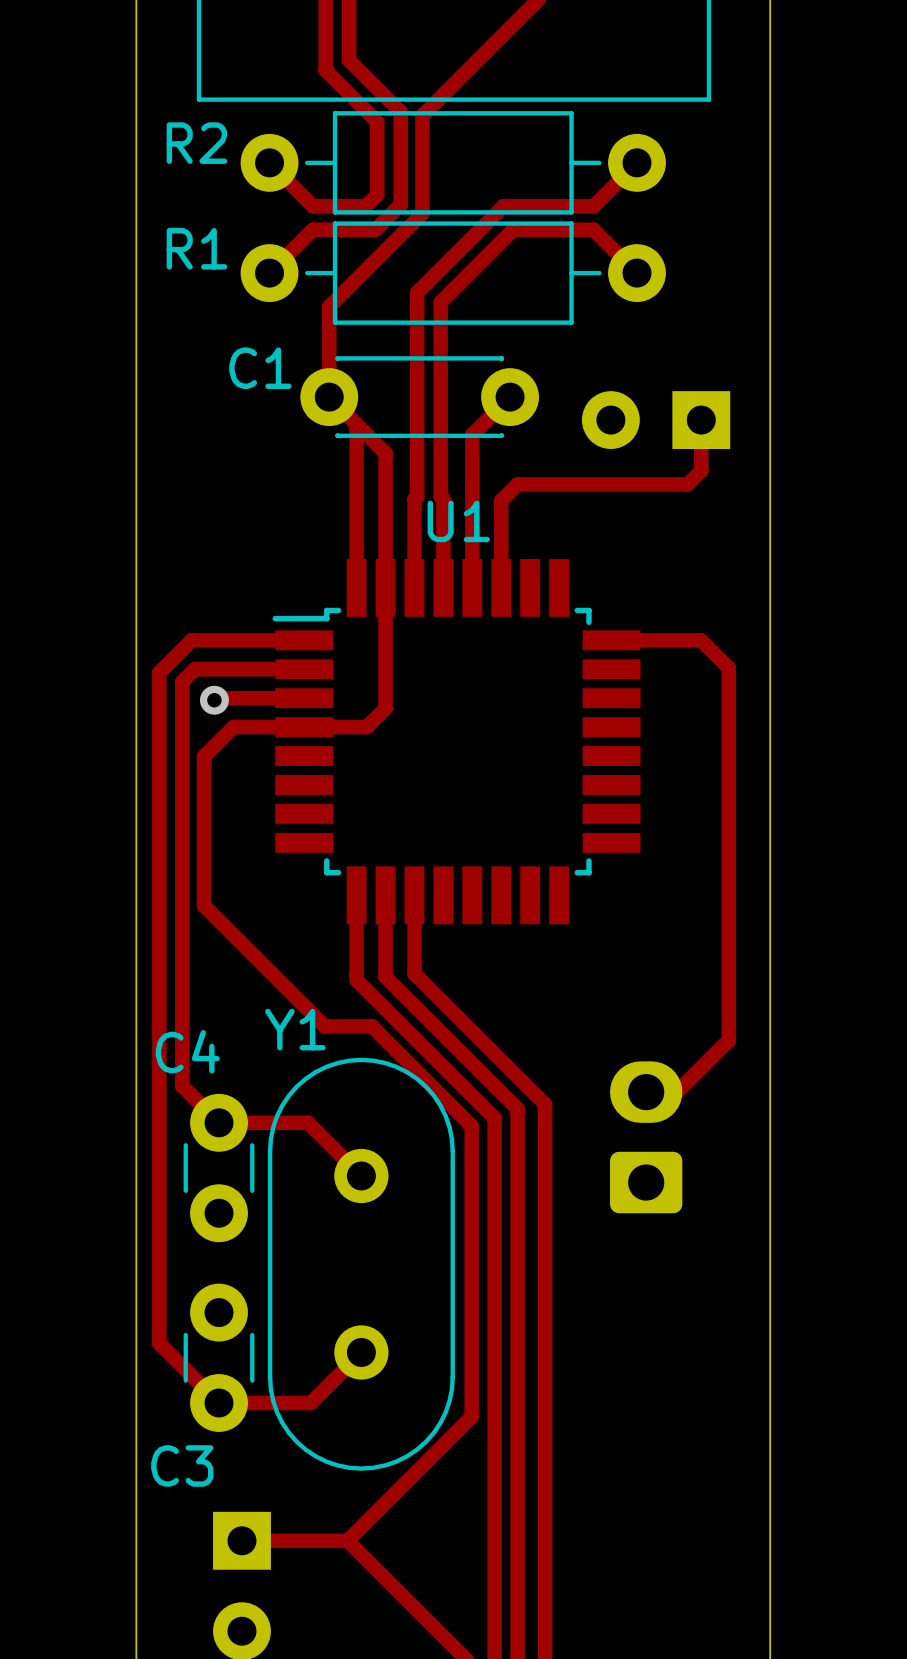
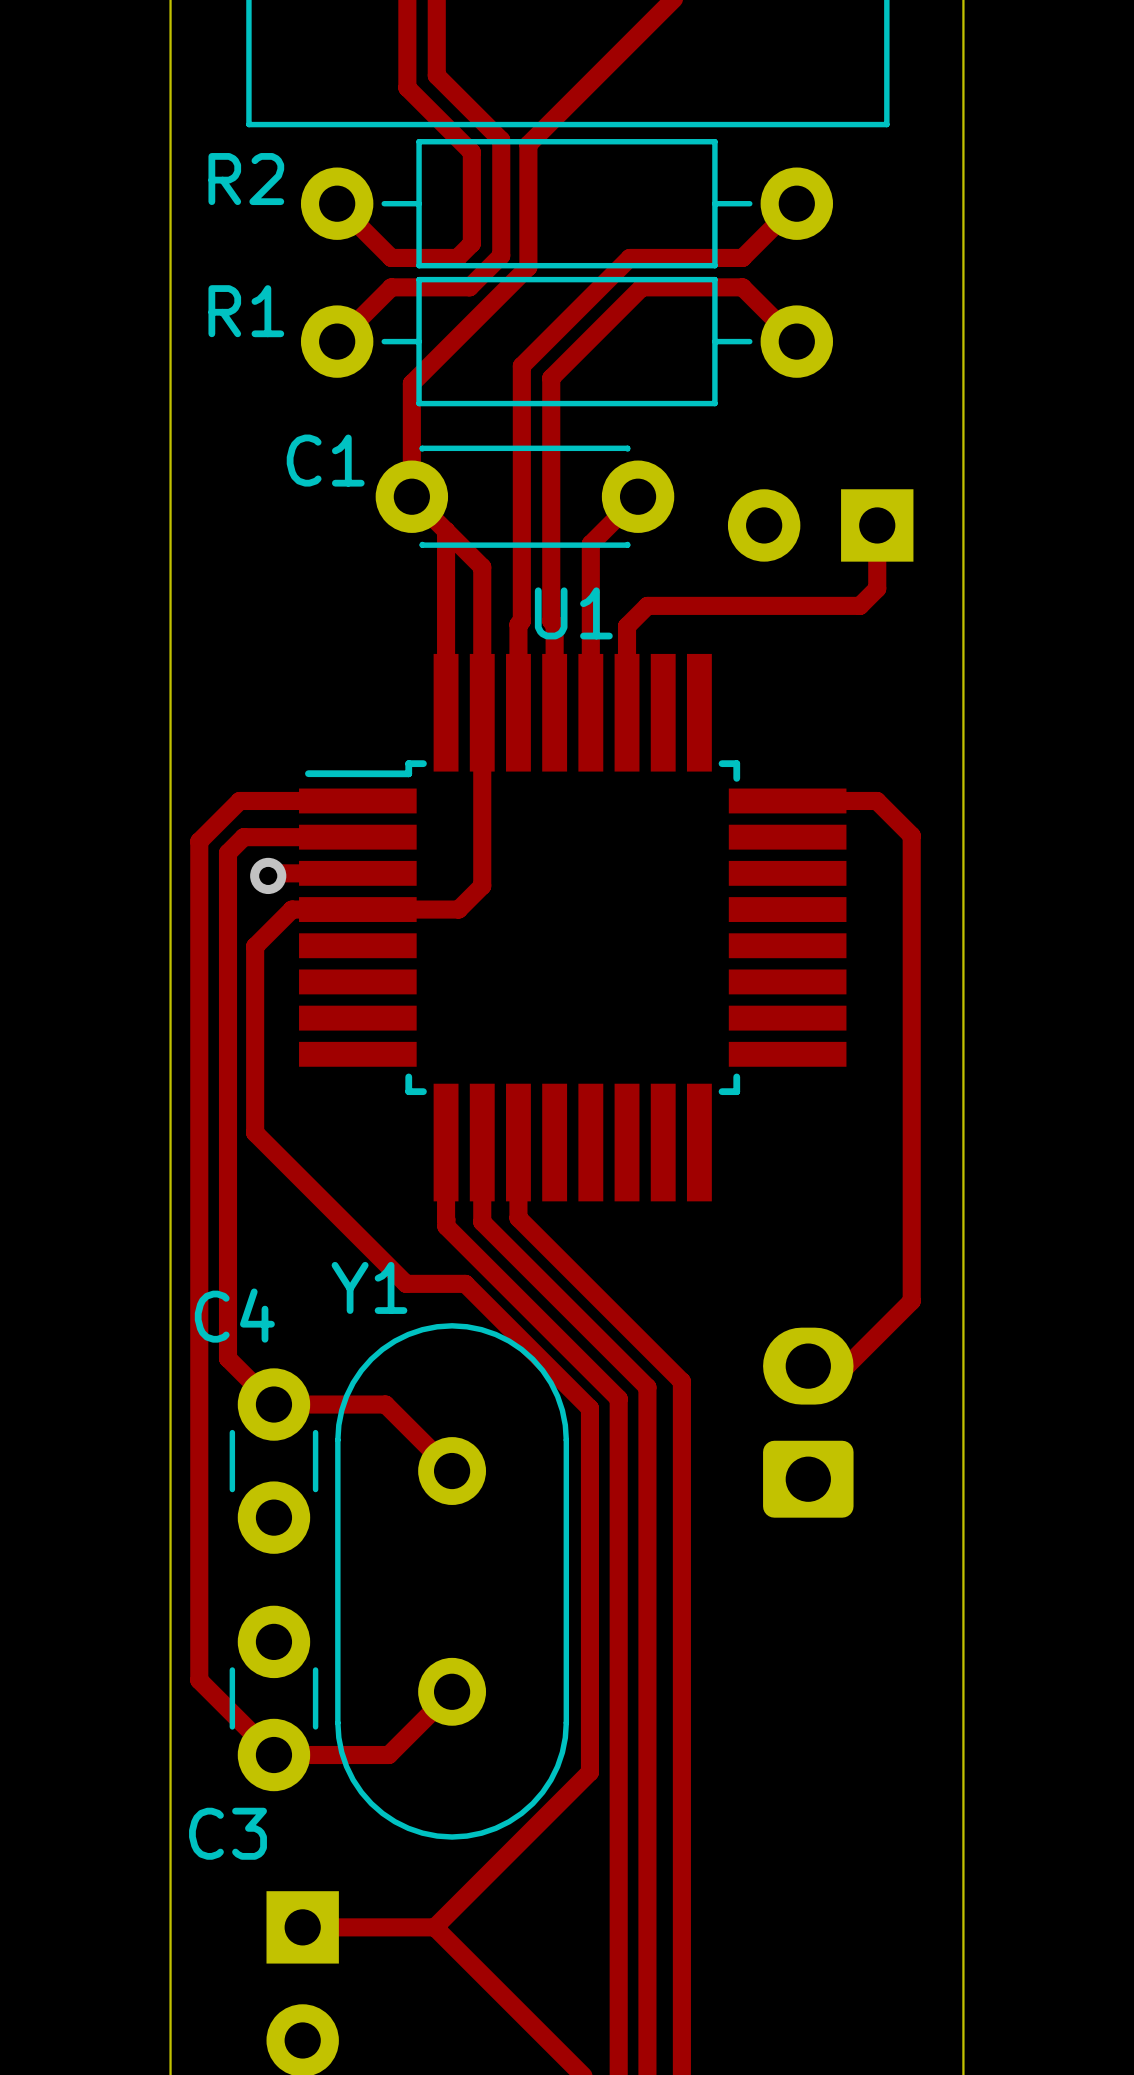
U1 name position: U1 (458, 521) -> U1 (573, 613)
U1 footprint: [272, 558, 641, 925] -> [299, 653, 847, 1202]

